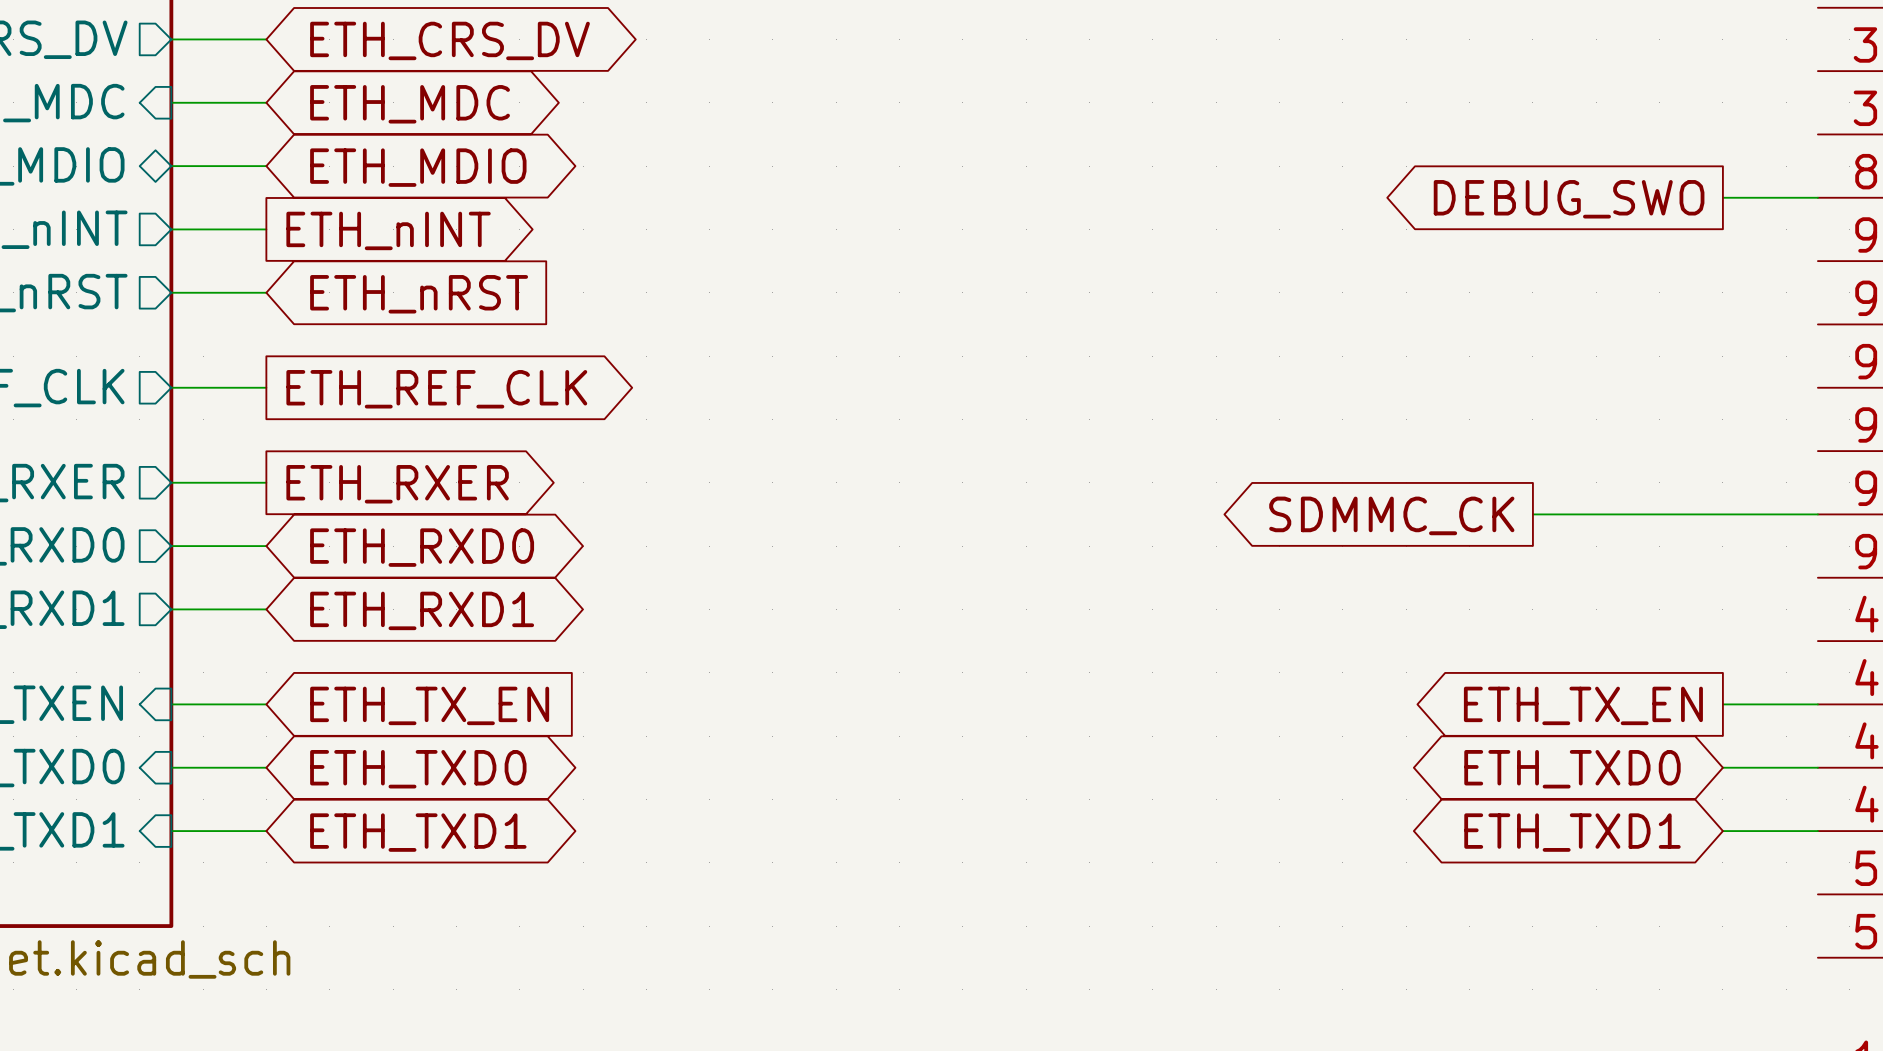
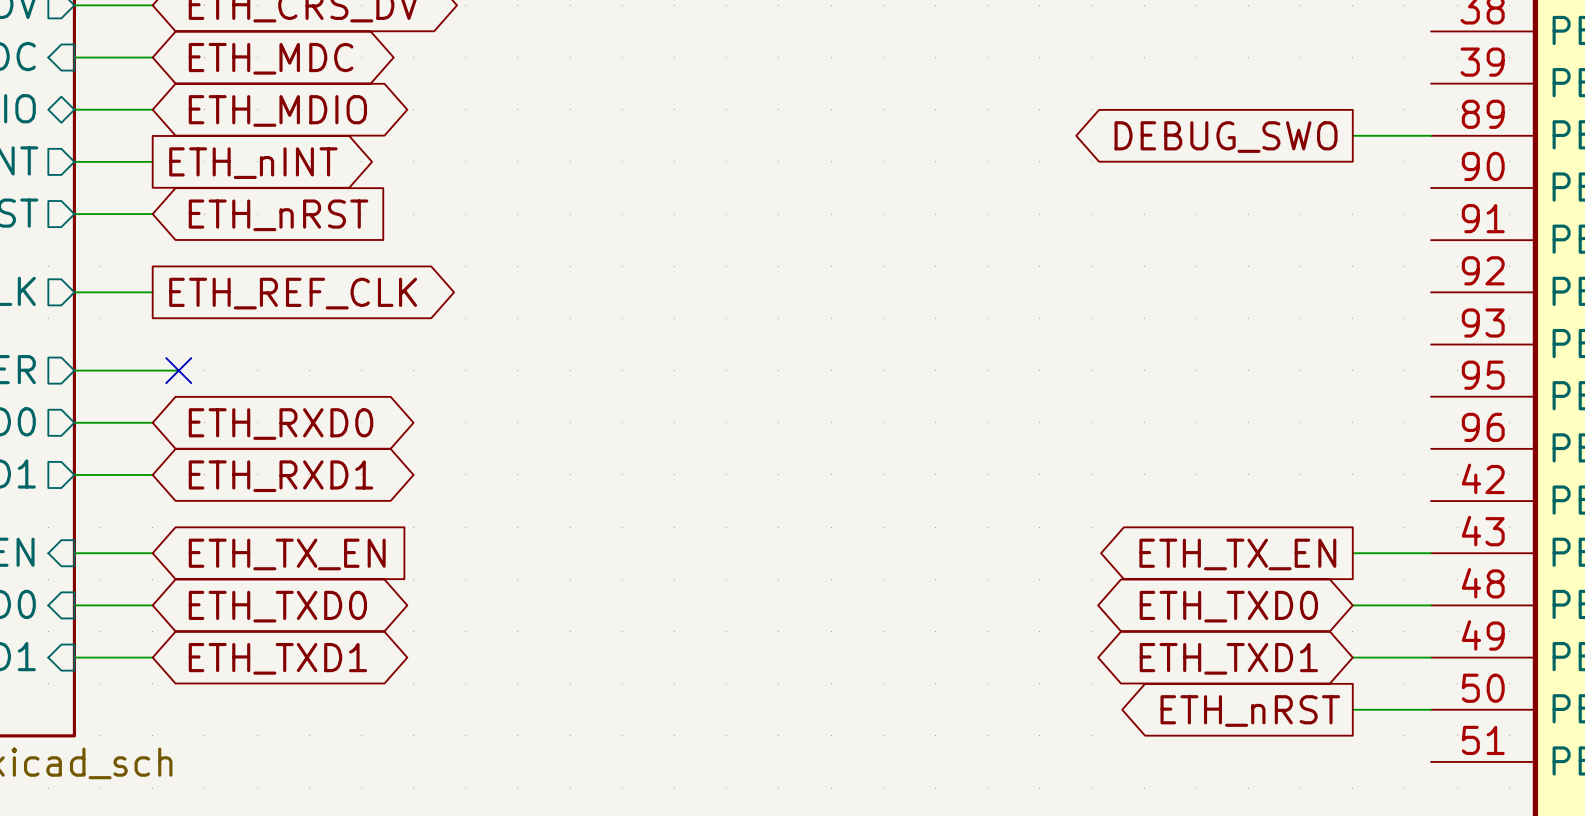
wire: none -> (152, 370) (178, 370)
no-connect mark: none -> (178, 370)
global label: ETH_RXER (397, 484) -> none
wire: (1532, 514) (1817, 514) -> none
global label: SDMMC_CK (1391, 515) -> none
wire: none -> (1352, 709) (1431, 709)
global label: none -> ETH_nRST (1250, 711)

